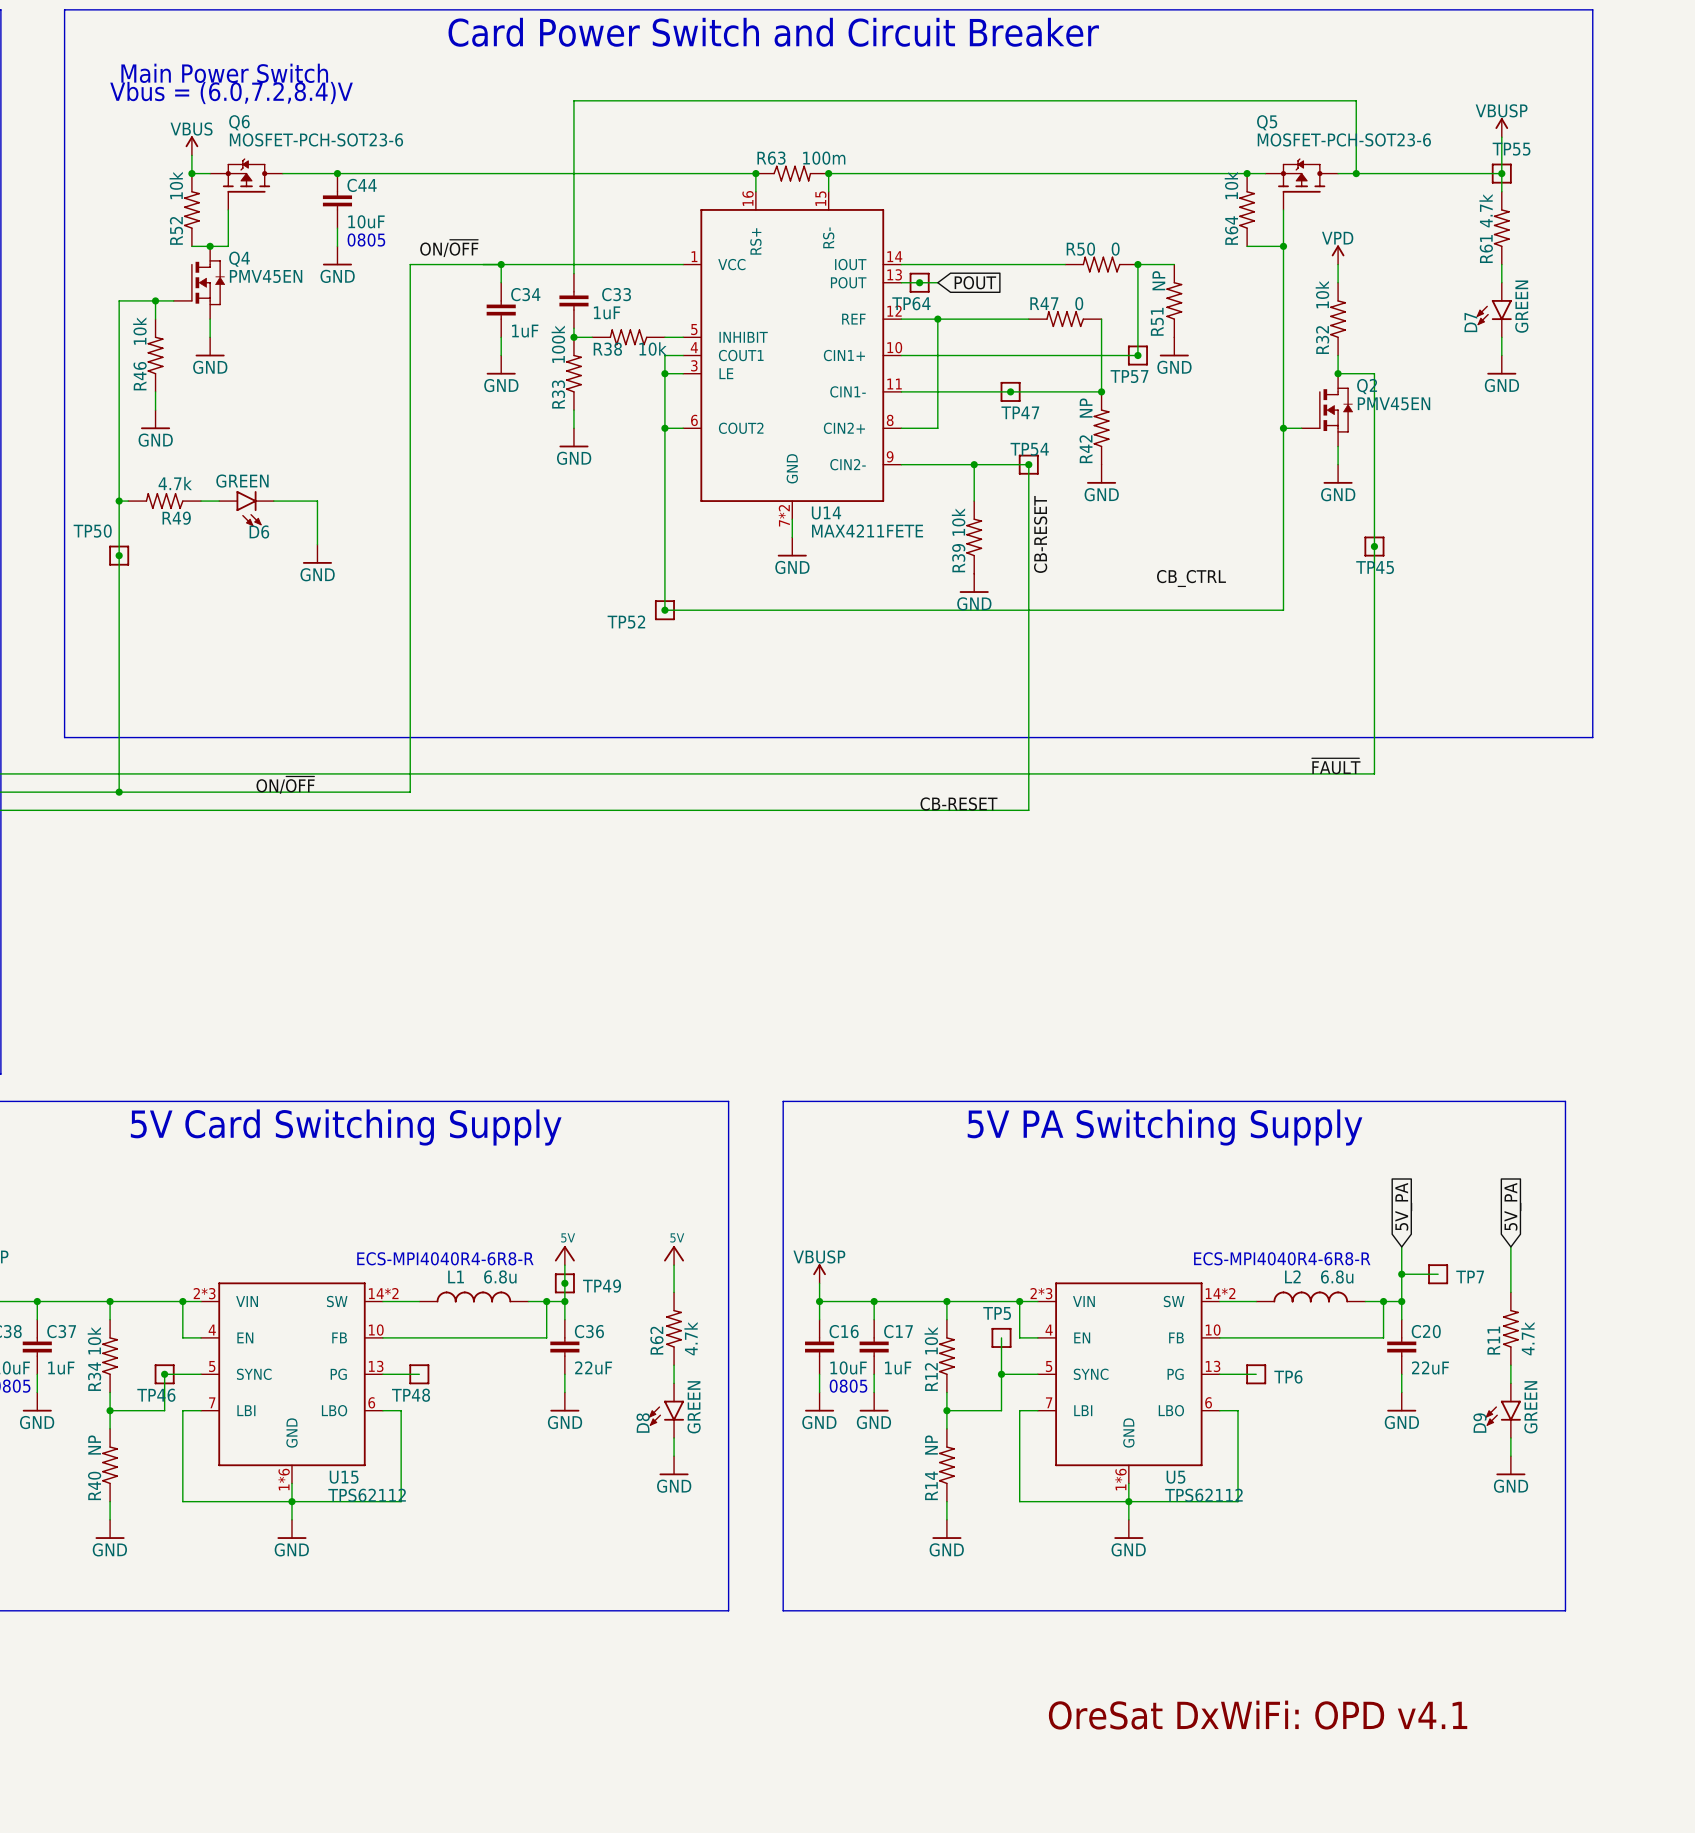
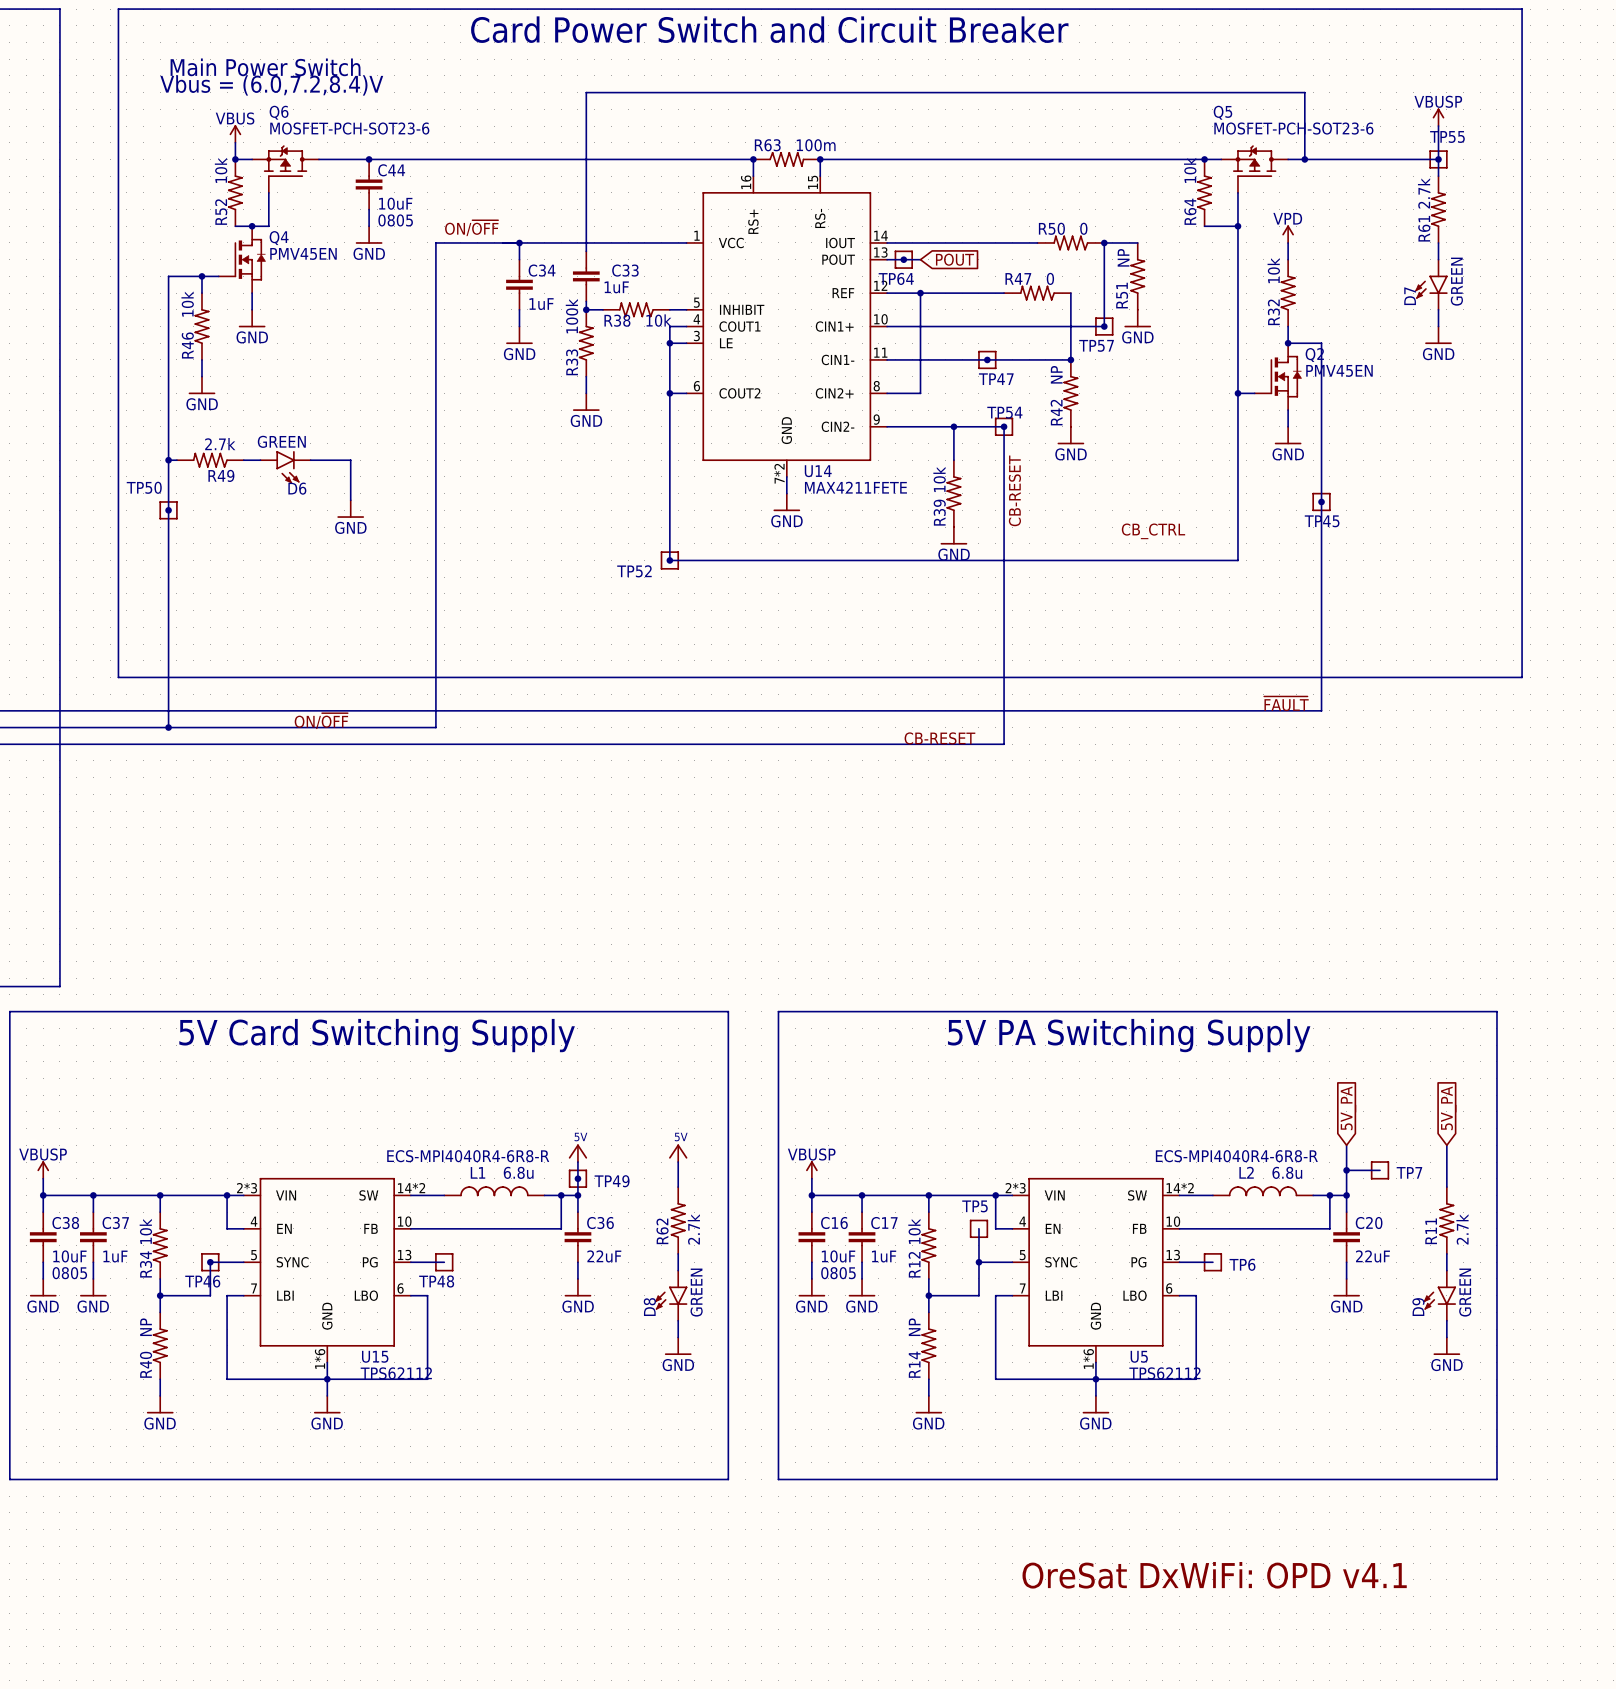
R61 value: 4.7k (1486, 210) -> 2.7k (1424, 193)
R49 value: 4.7k (175, 483) -> 2.7k (220, 444)
R62 value: 4.7k (691, 1338) -> 2.7k (693, 1229)
R11 value: 4.7k (1527, 1338) -> 2.7k (1462, 1229)

